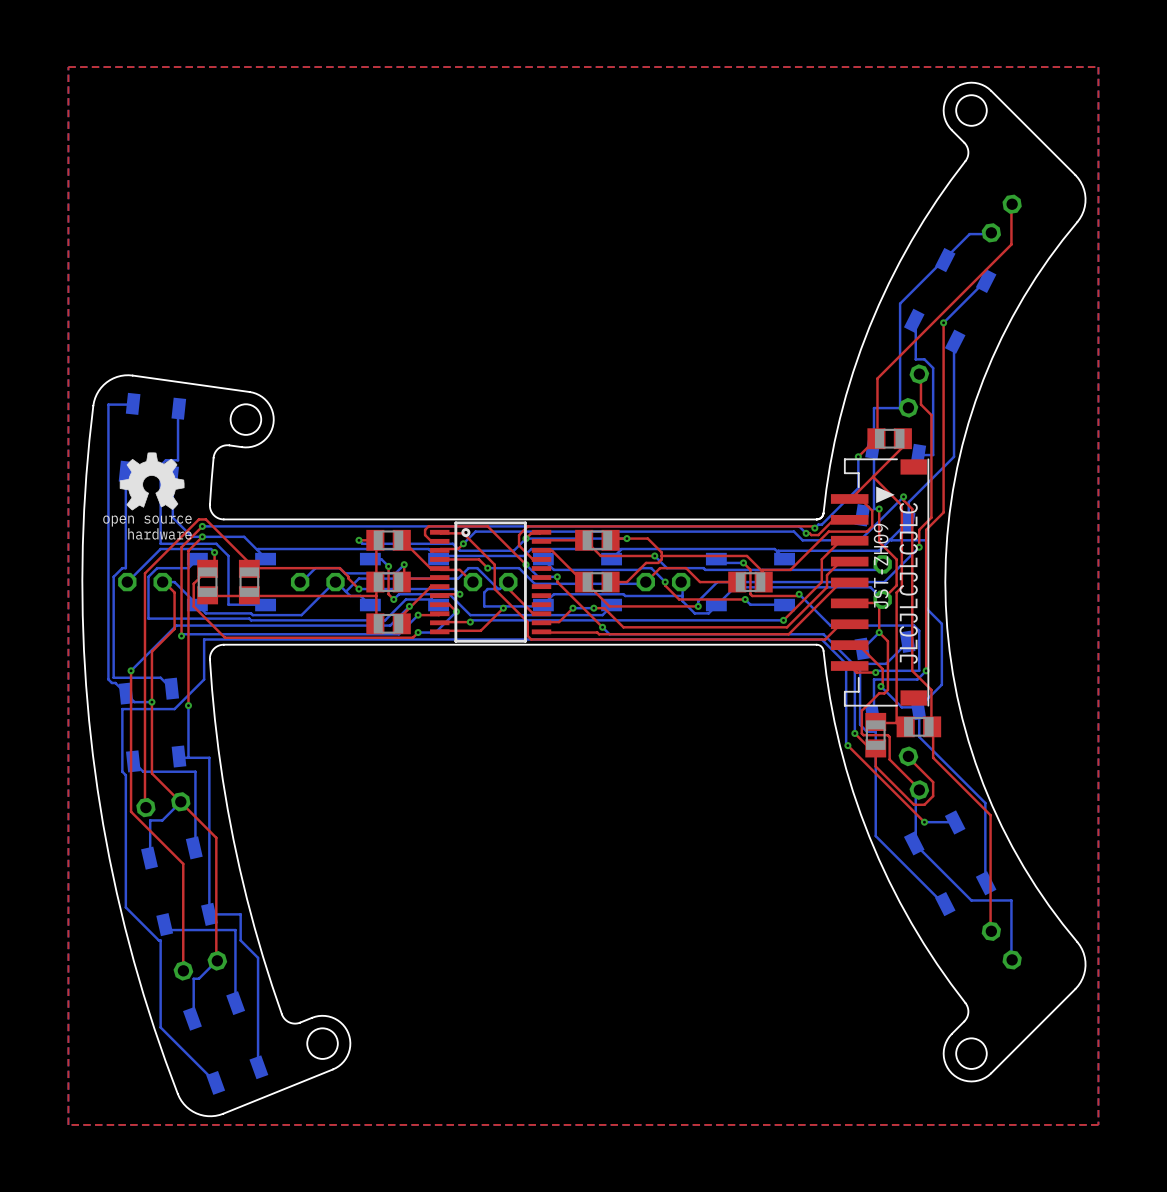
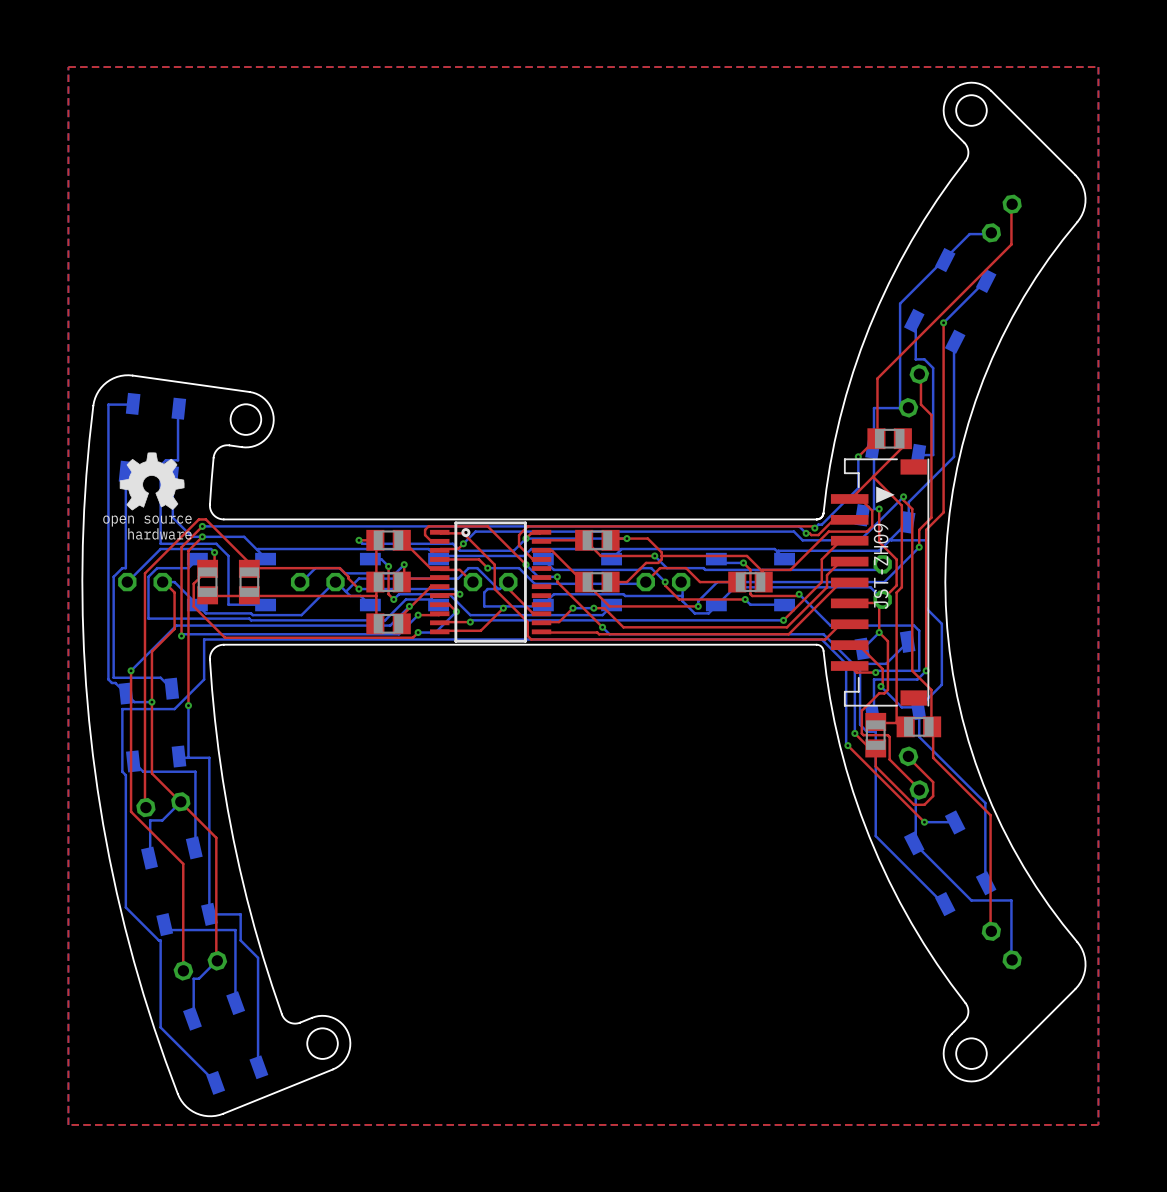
text: JLCJLCJLCJLC (908, 583) -> none

